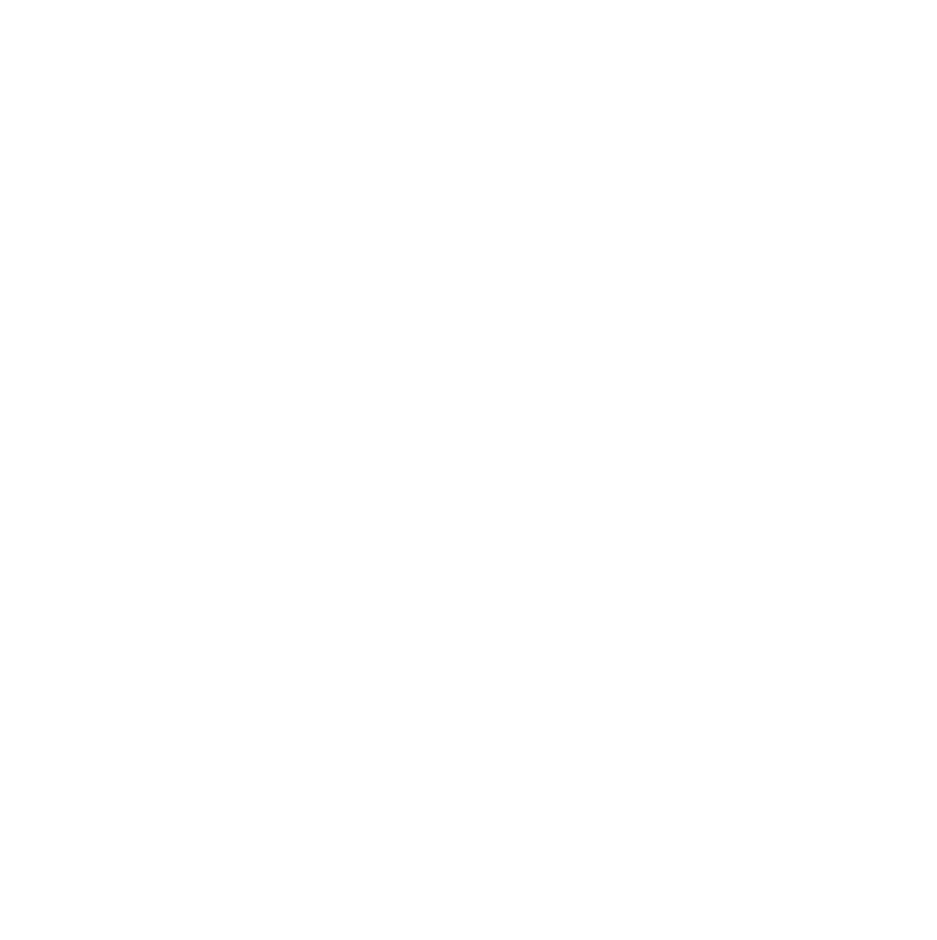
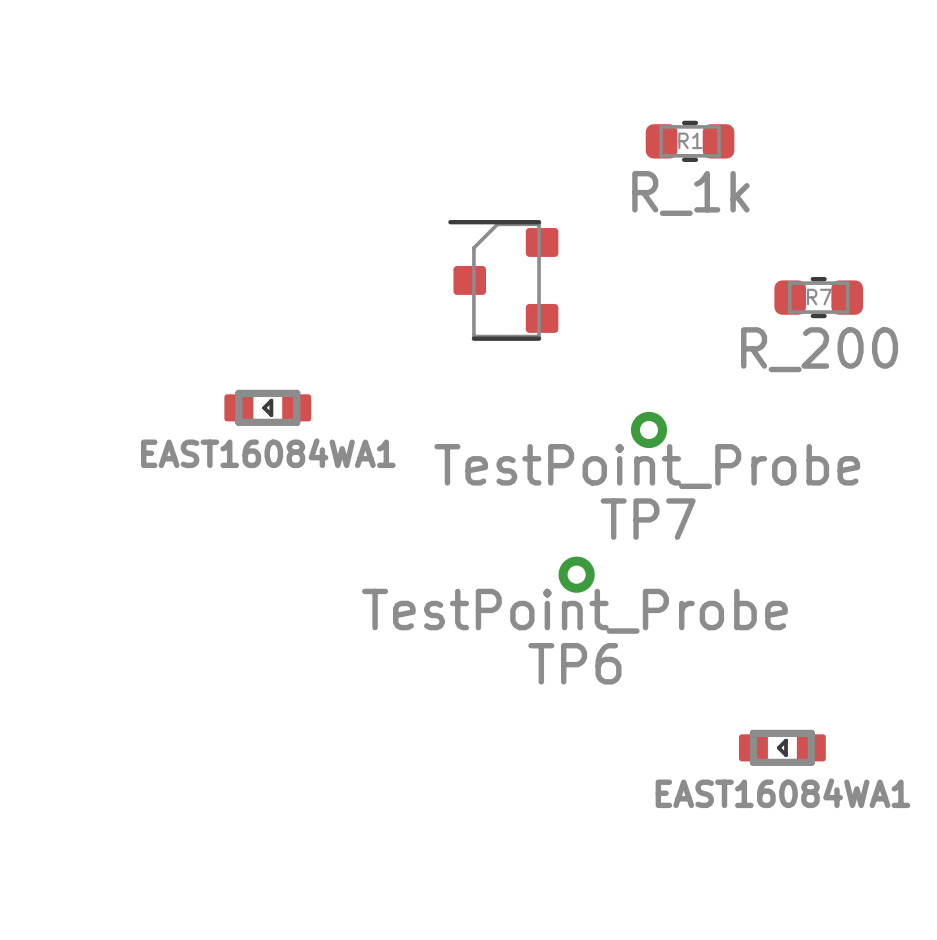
R1: none -> R_1k (690, 141)
part: none -> (503, 280)
R7: none -> R_200 (818, 297)
part: none -> EAST16084WA1 (267, 407)
TP7: none -> TestPoint_Probe (649, 429)
TP6: none -> TestPoint_Probe (576, 574)
part: none -> EAST16084WA1 (782, 747)

